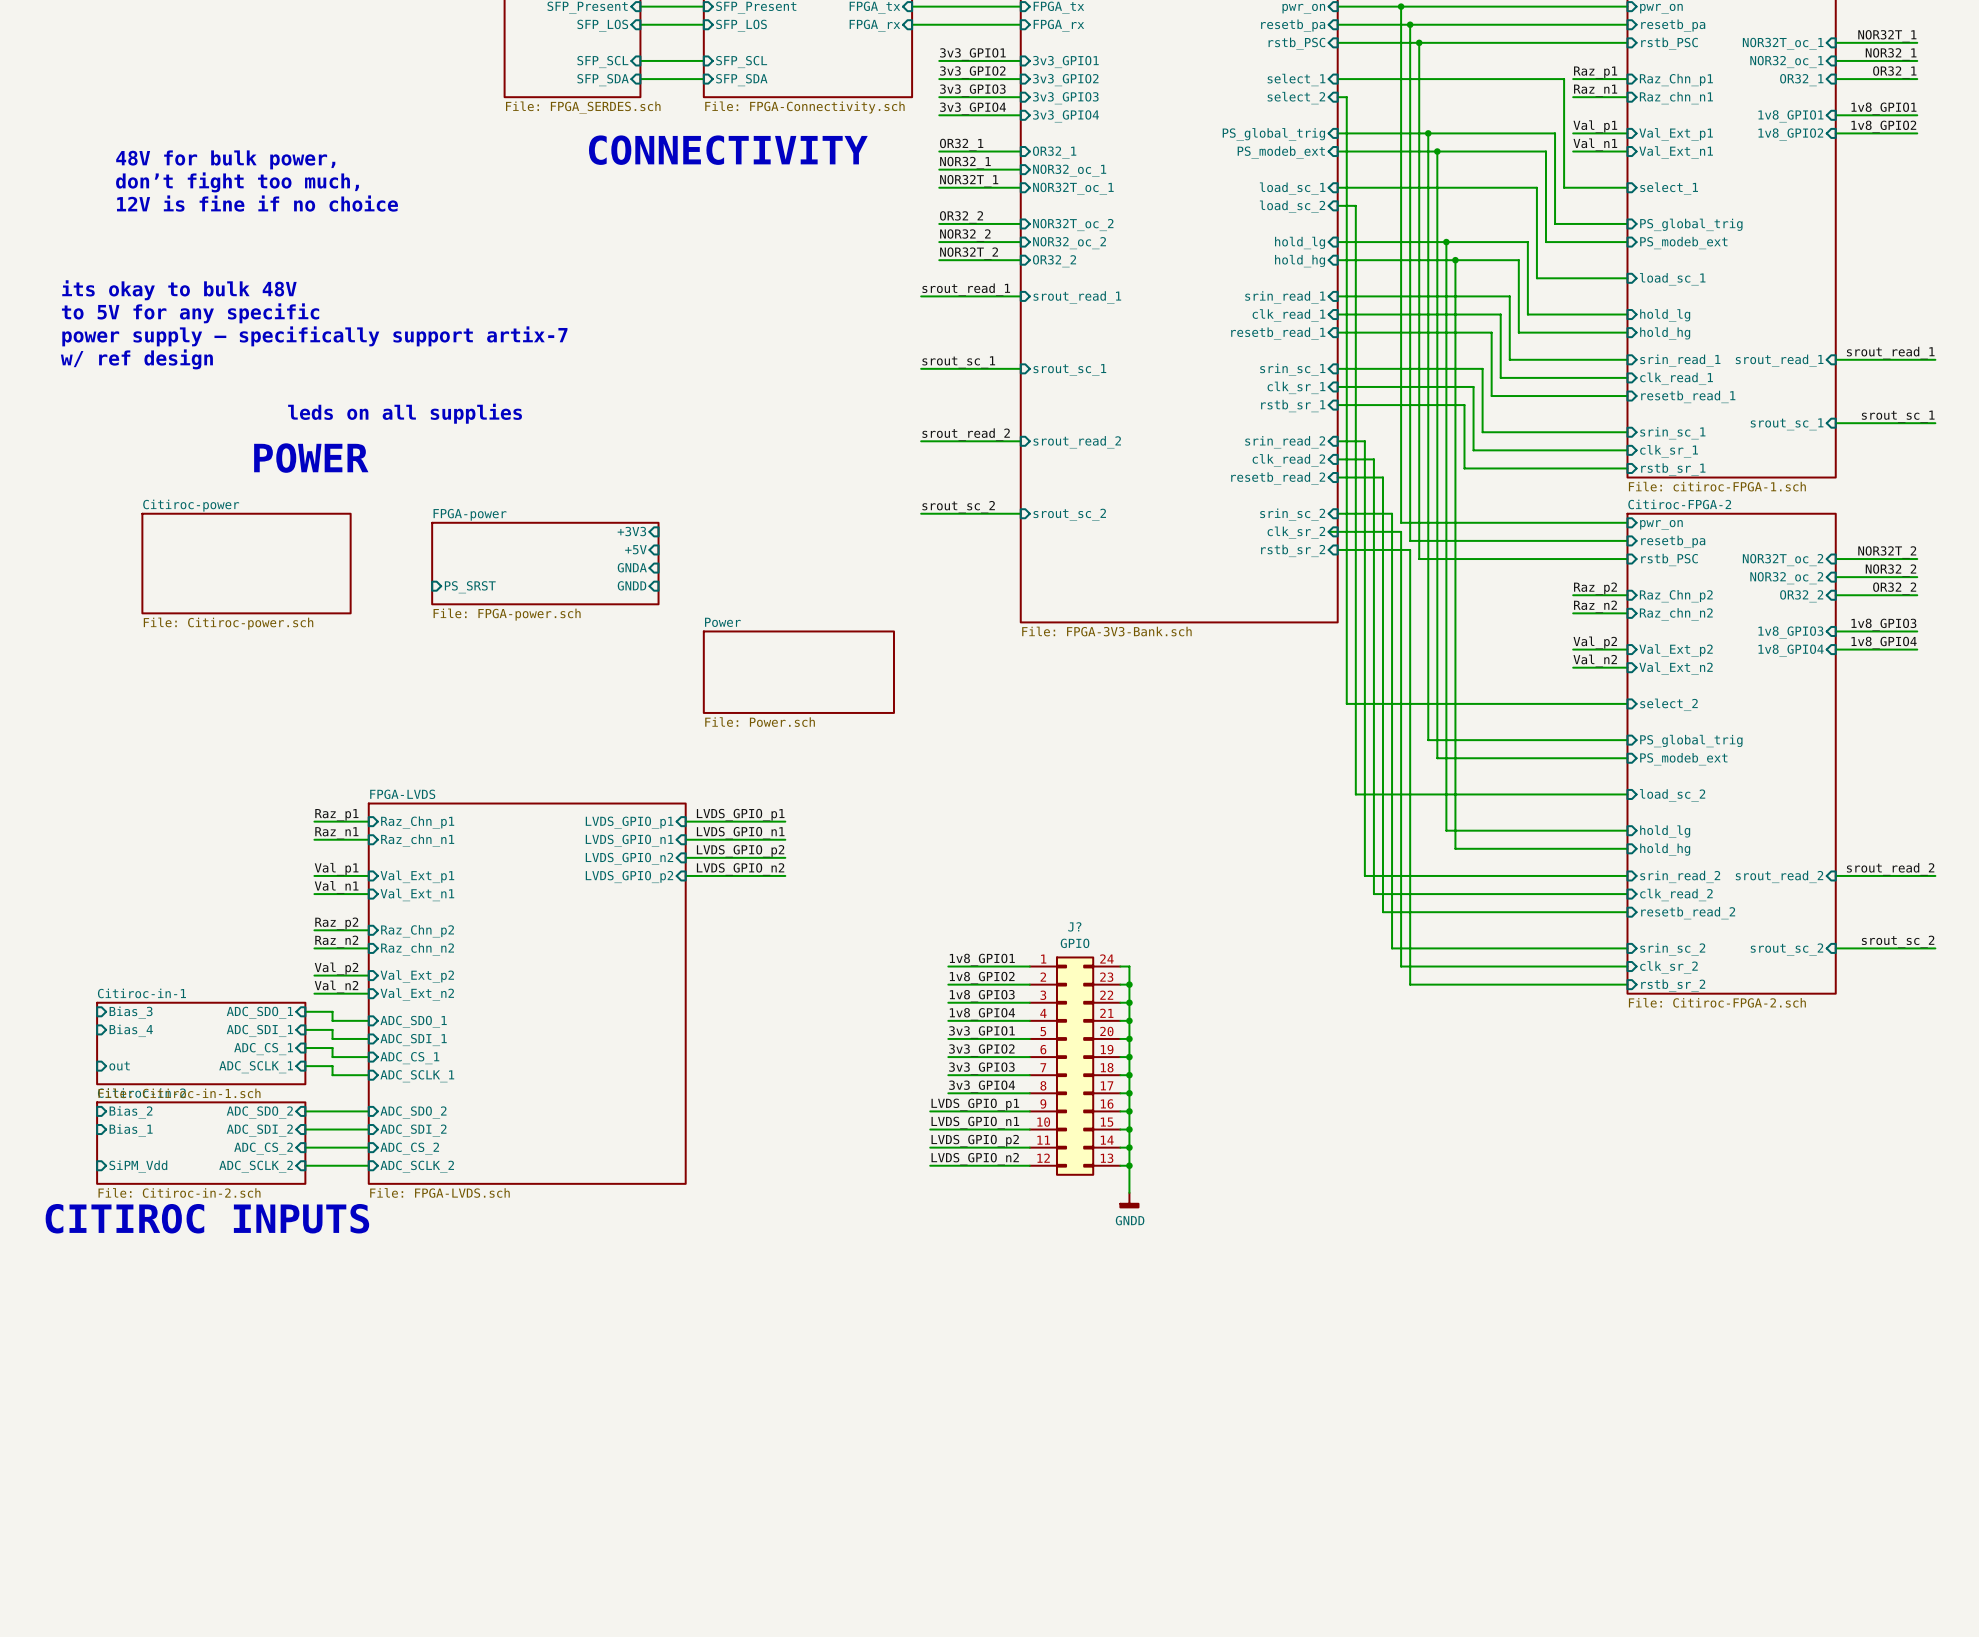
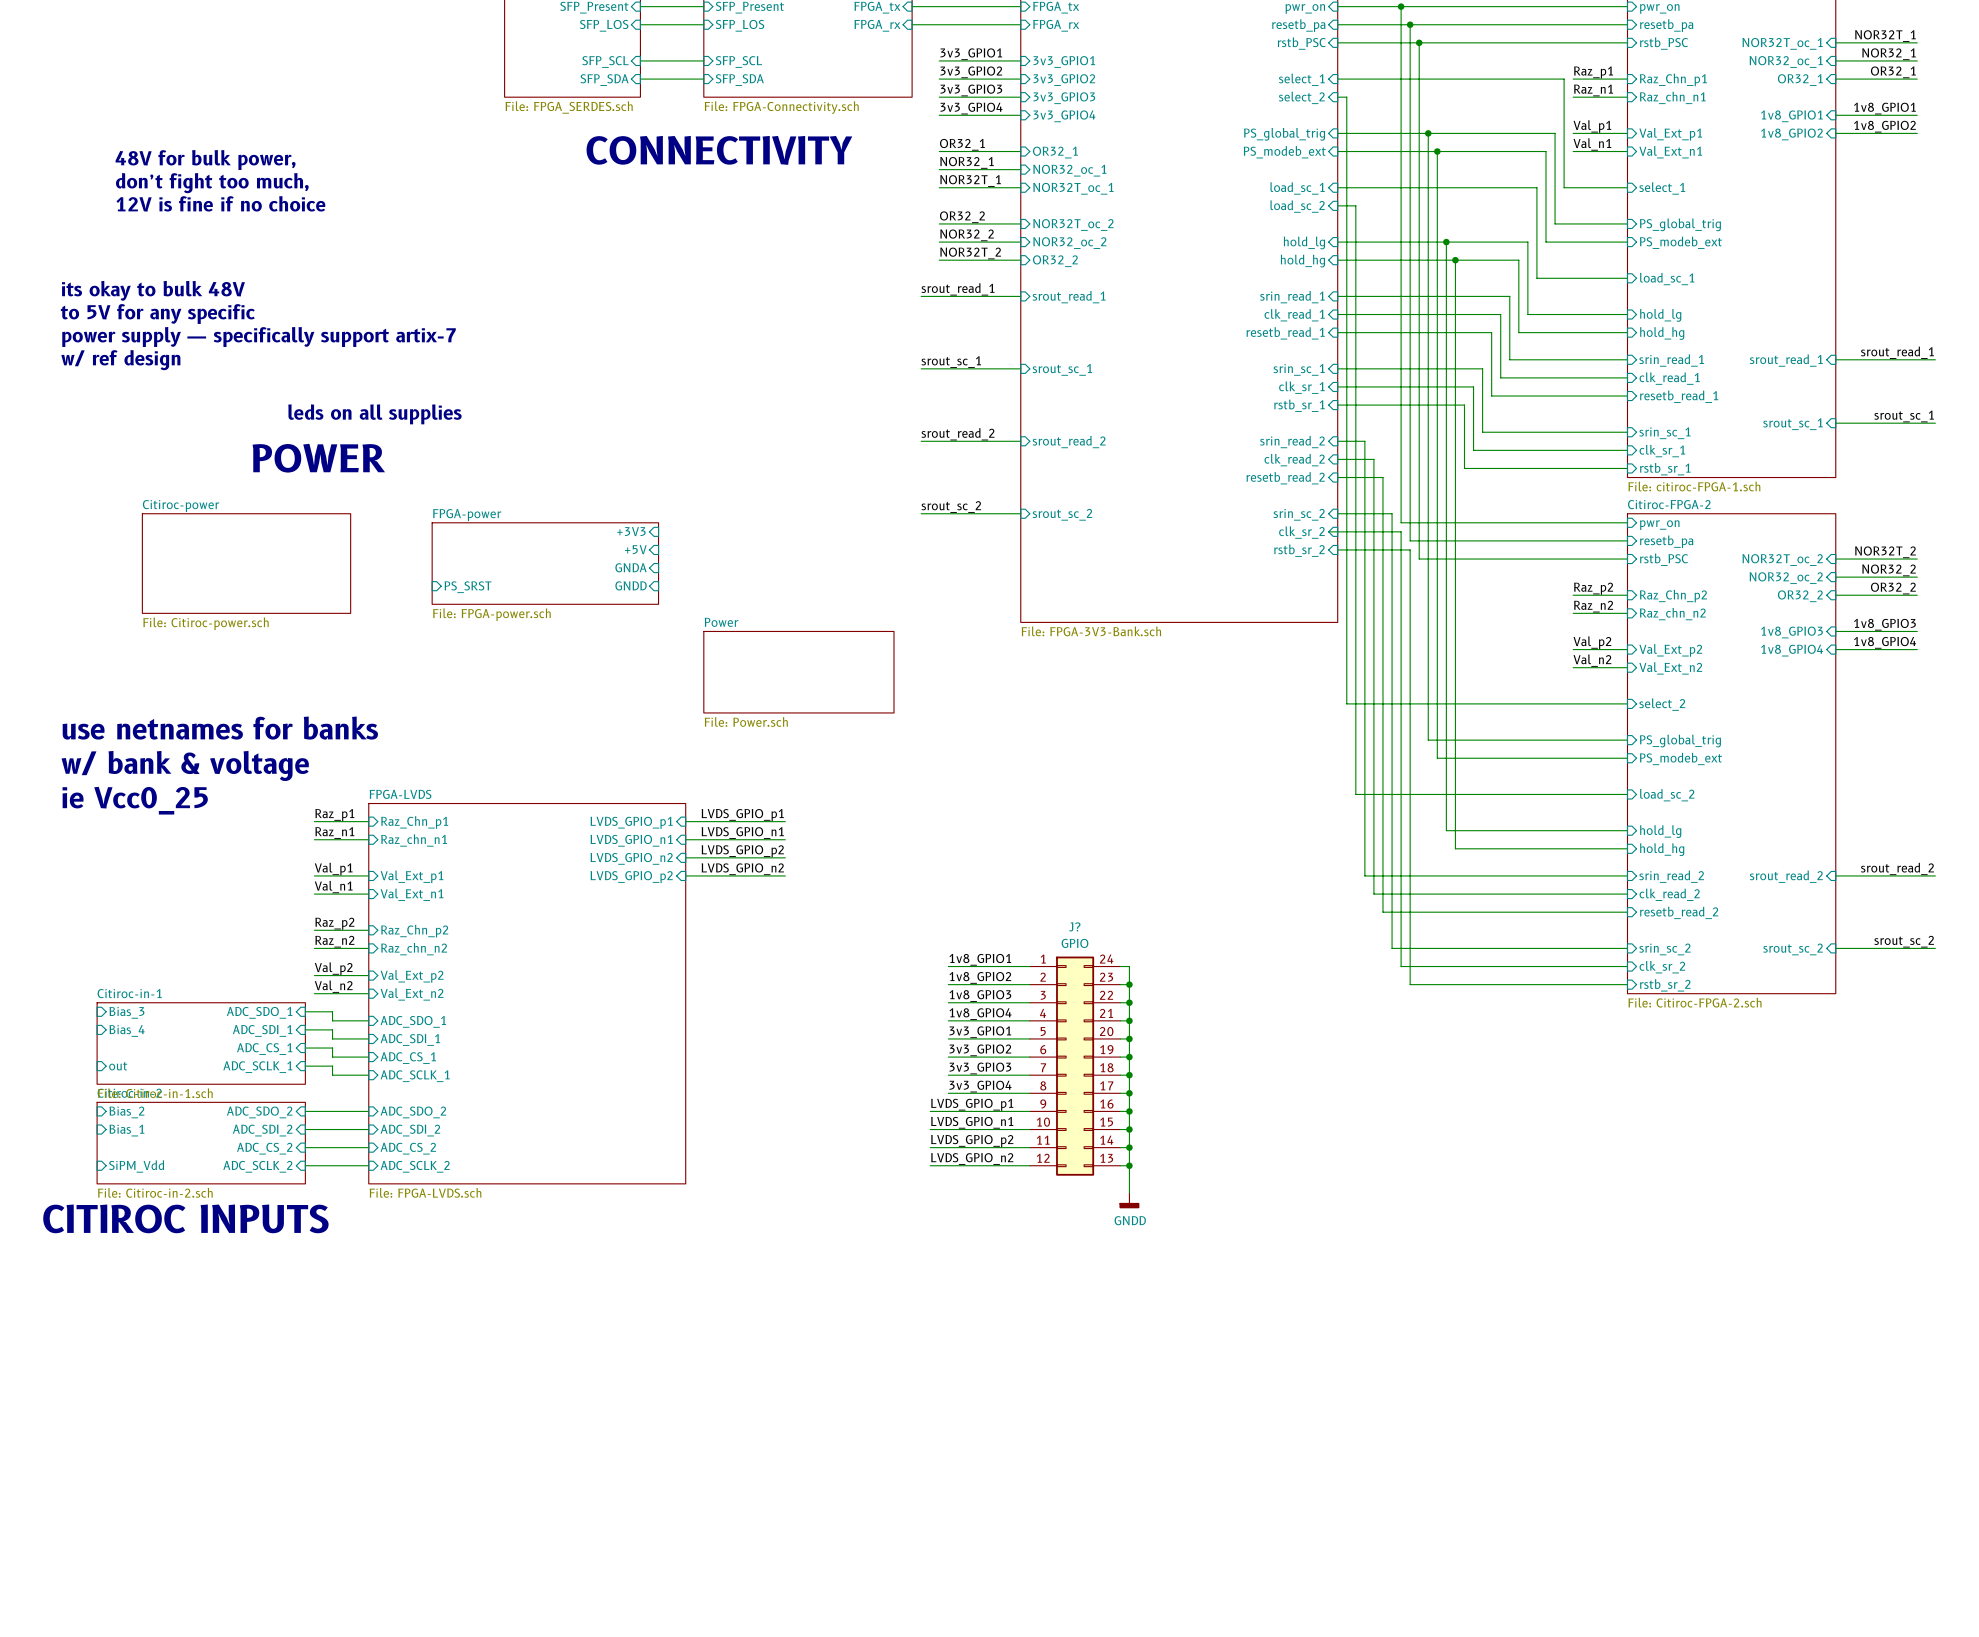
text: none -> use netnames for banks (220, 728)
text: none -> w/ bank & voltage (185, 765)
text: none -> ie Vcc0_25 (135, 800)

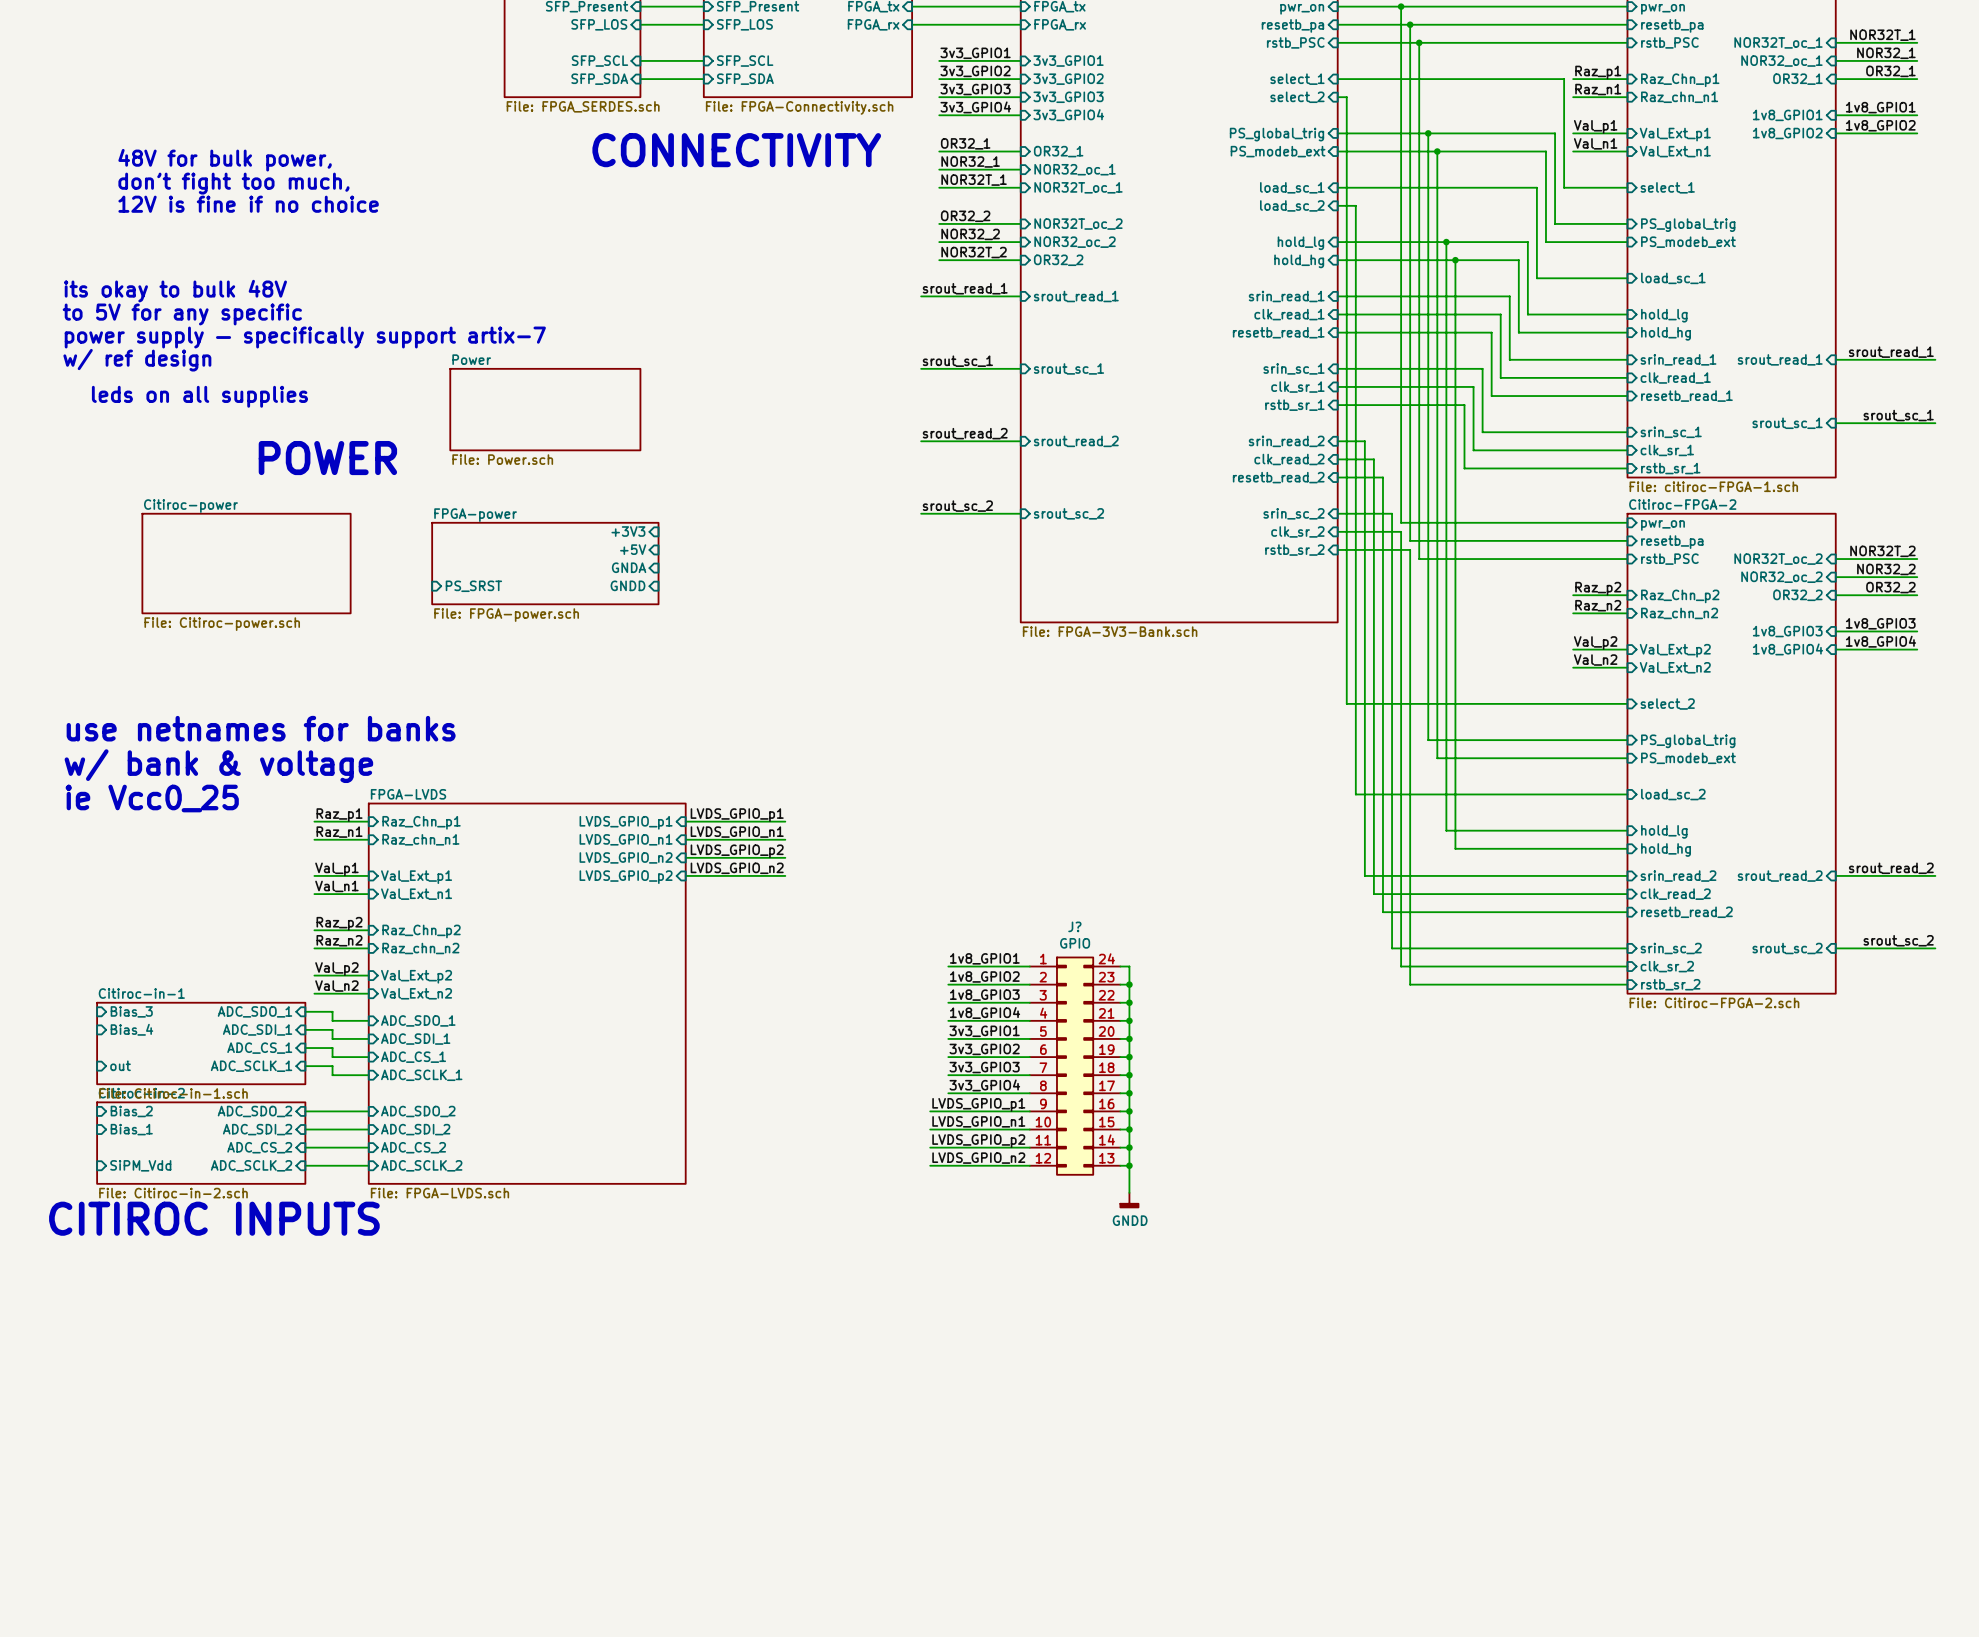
text: none -> leds on all supplies (199, 396)
sheet Power: none -> File: Power.sch (545, 409)
text: leds on all supplies (374, 414) -> none
wire: (1328, 531) (1337, 531) -> none
sheet Power: File: Power.sch (798, 672) -> none

